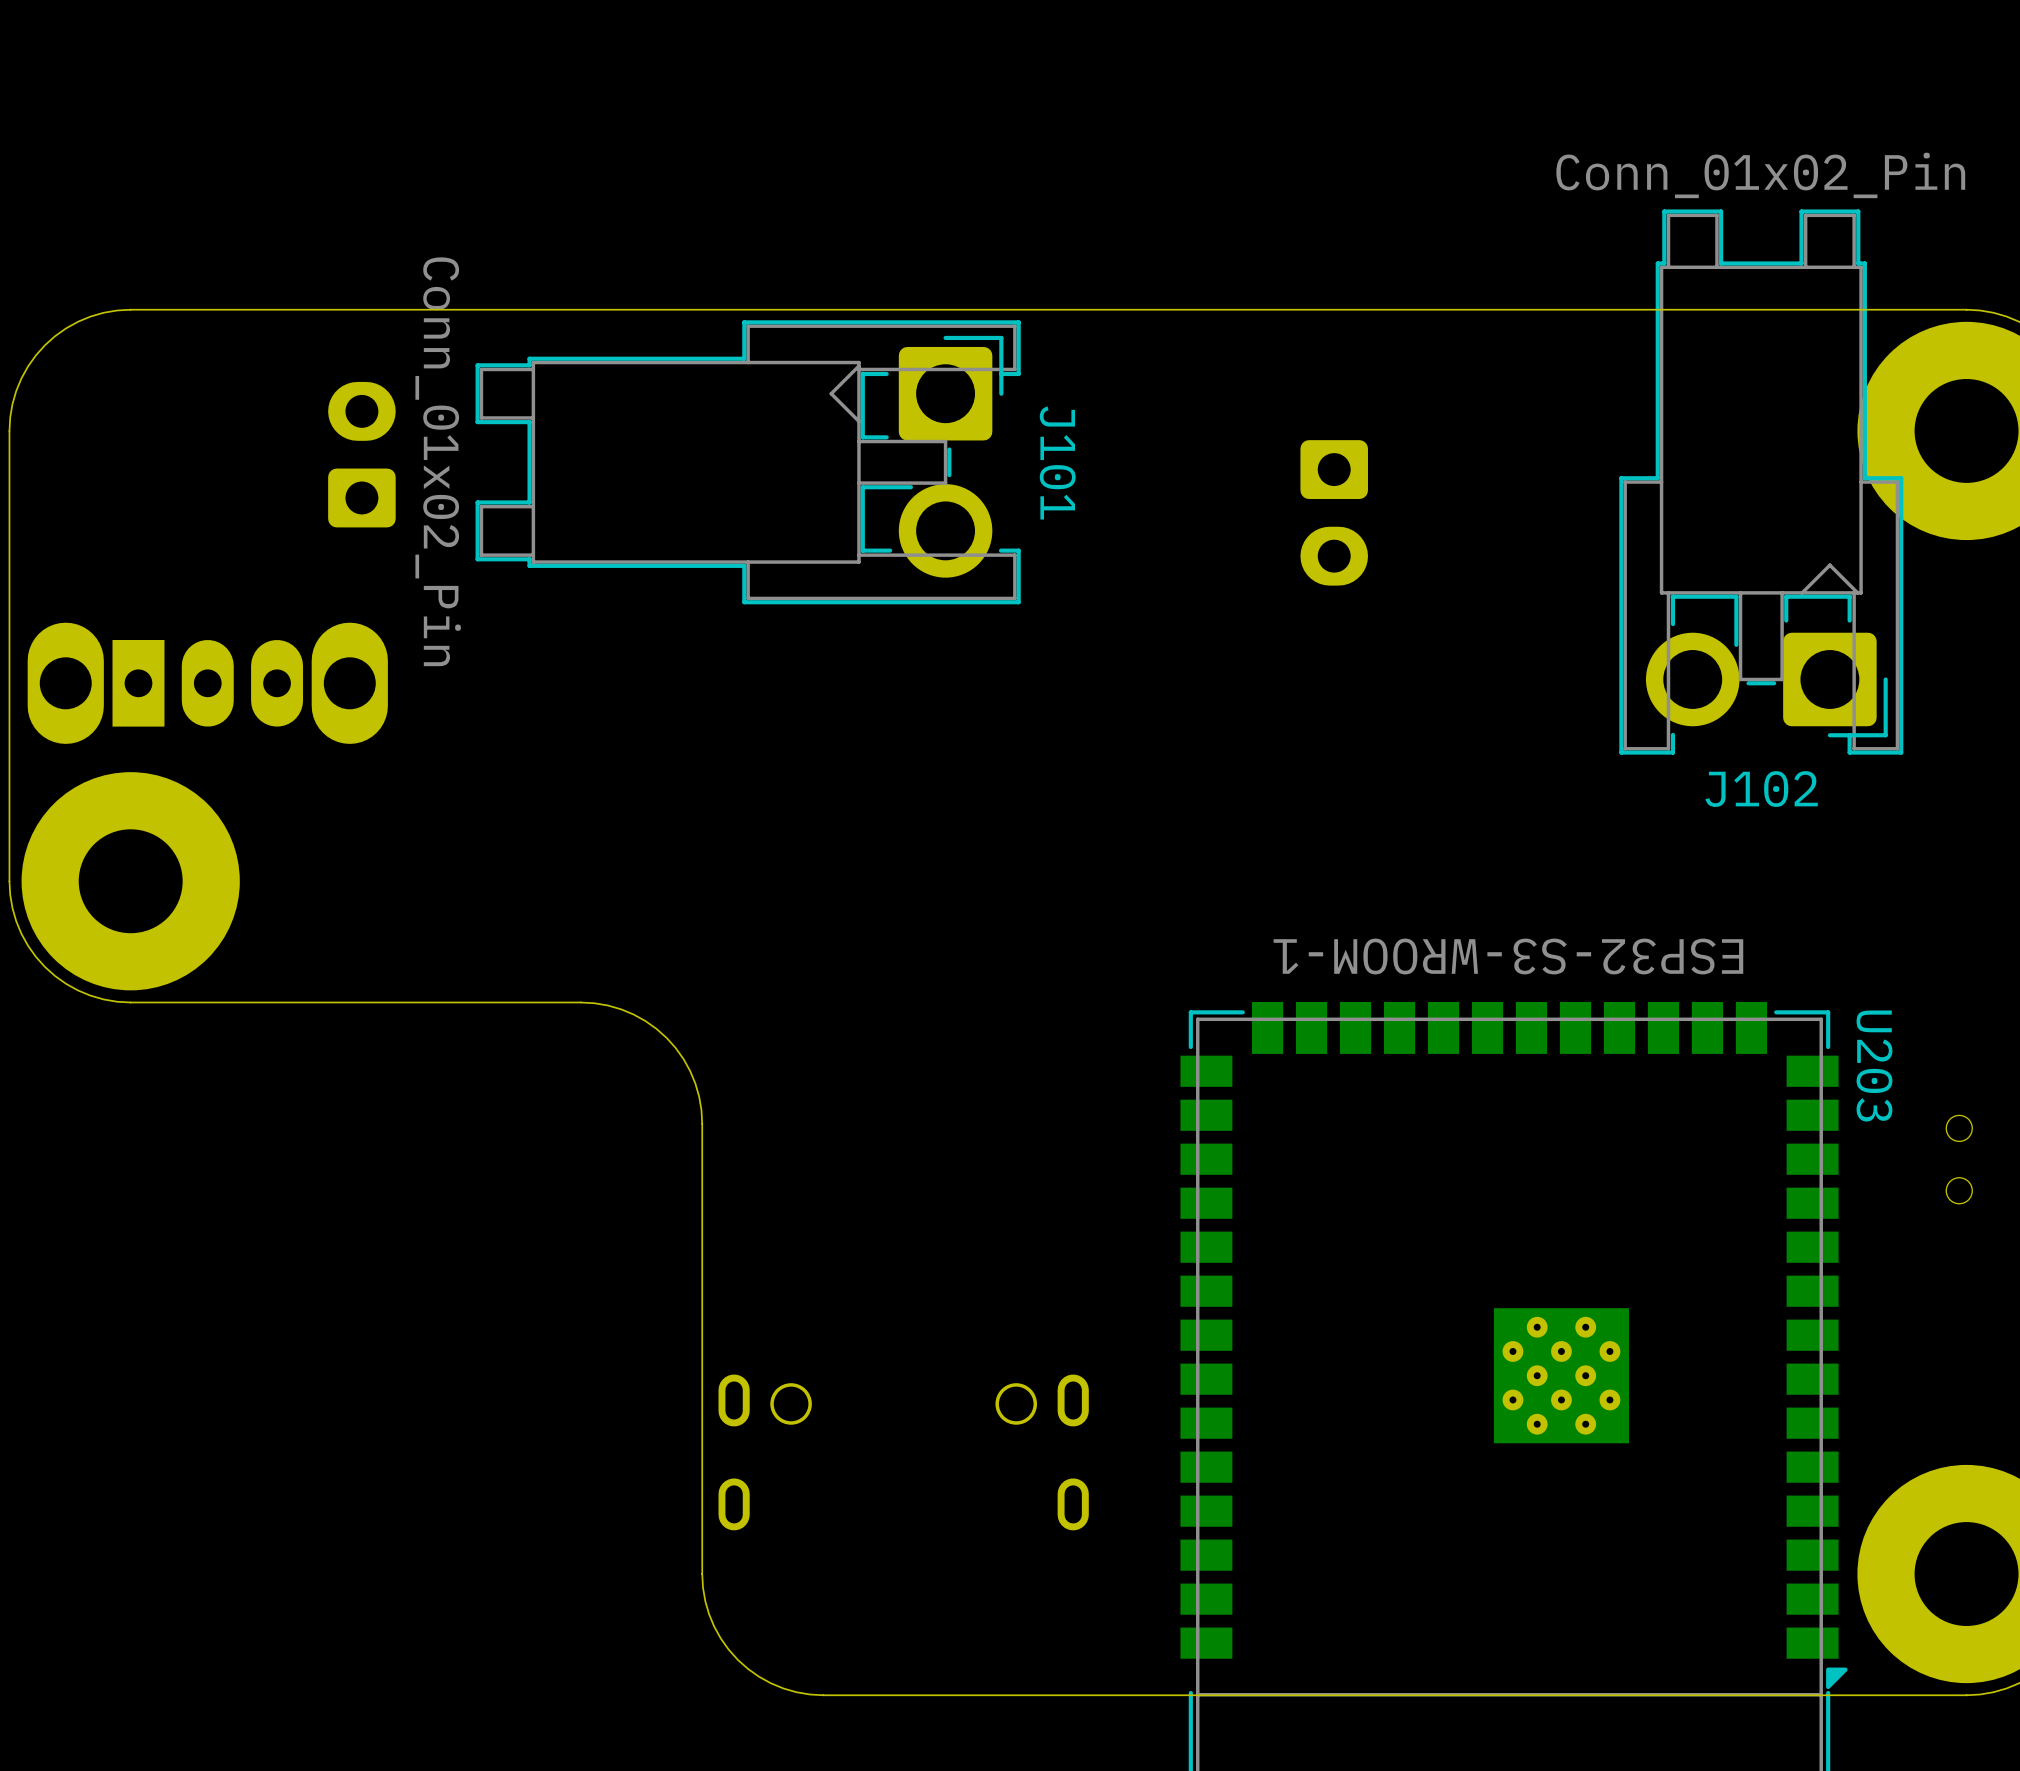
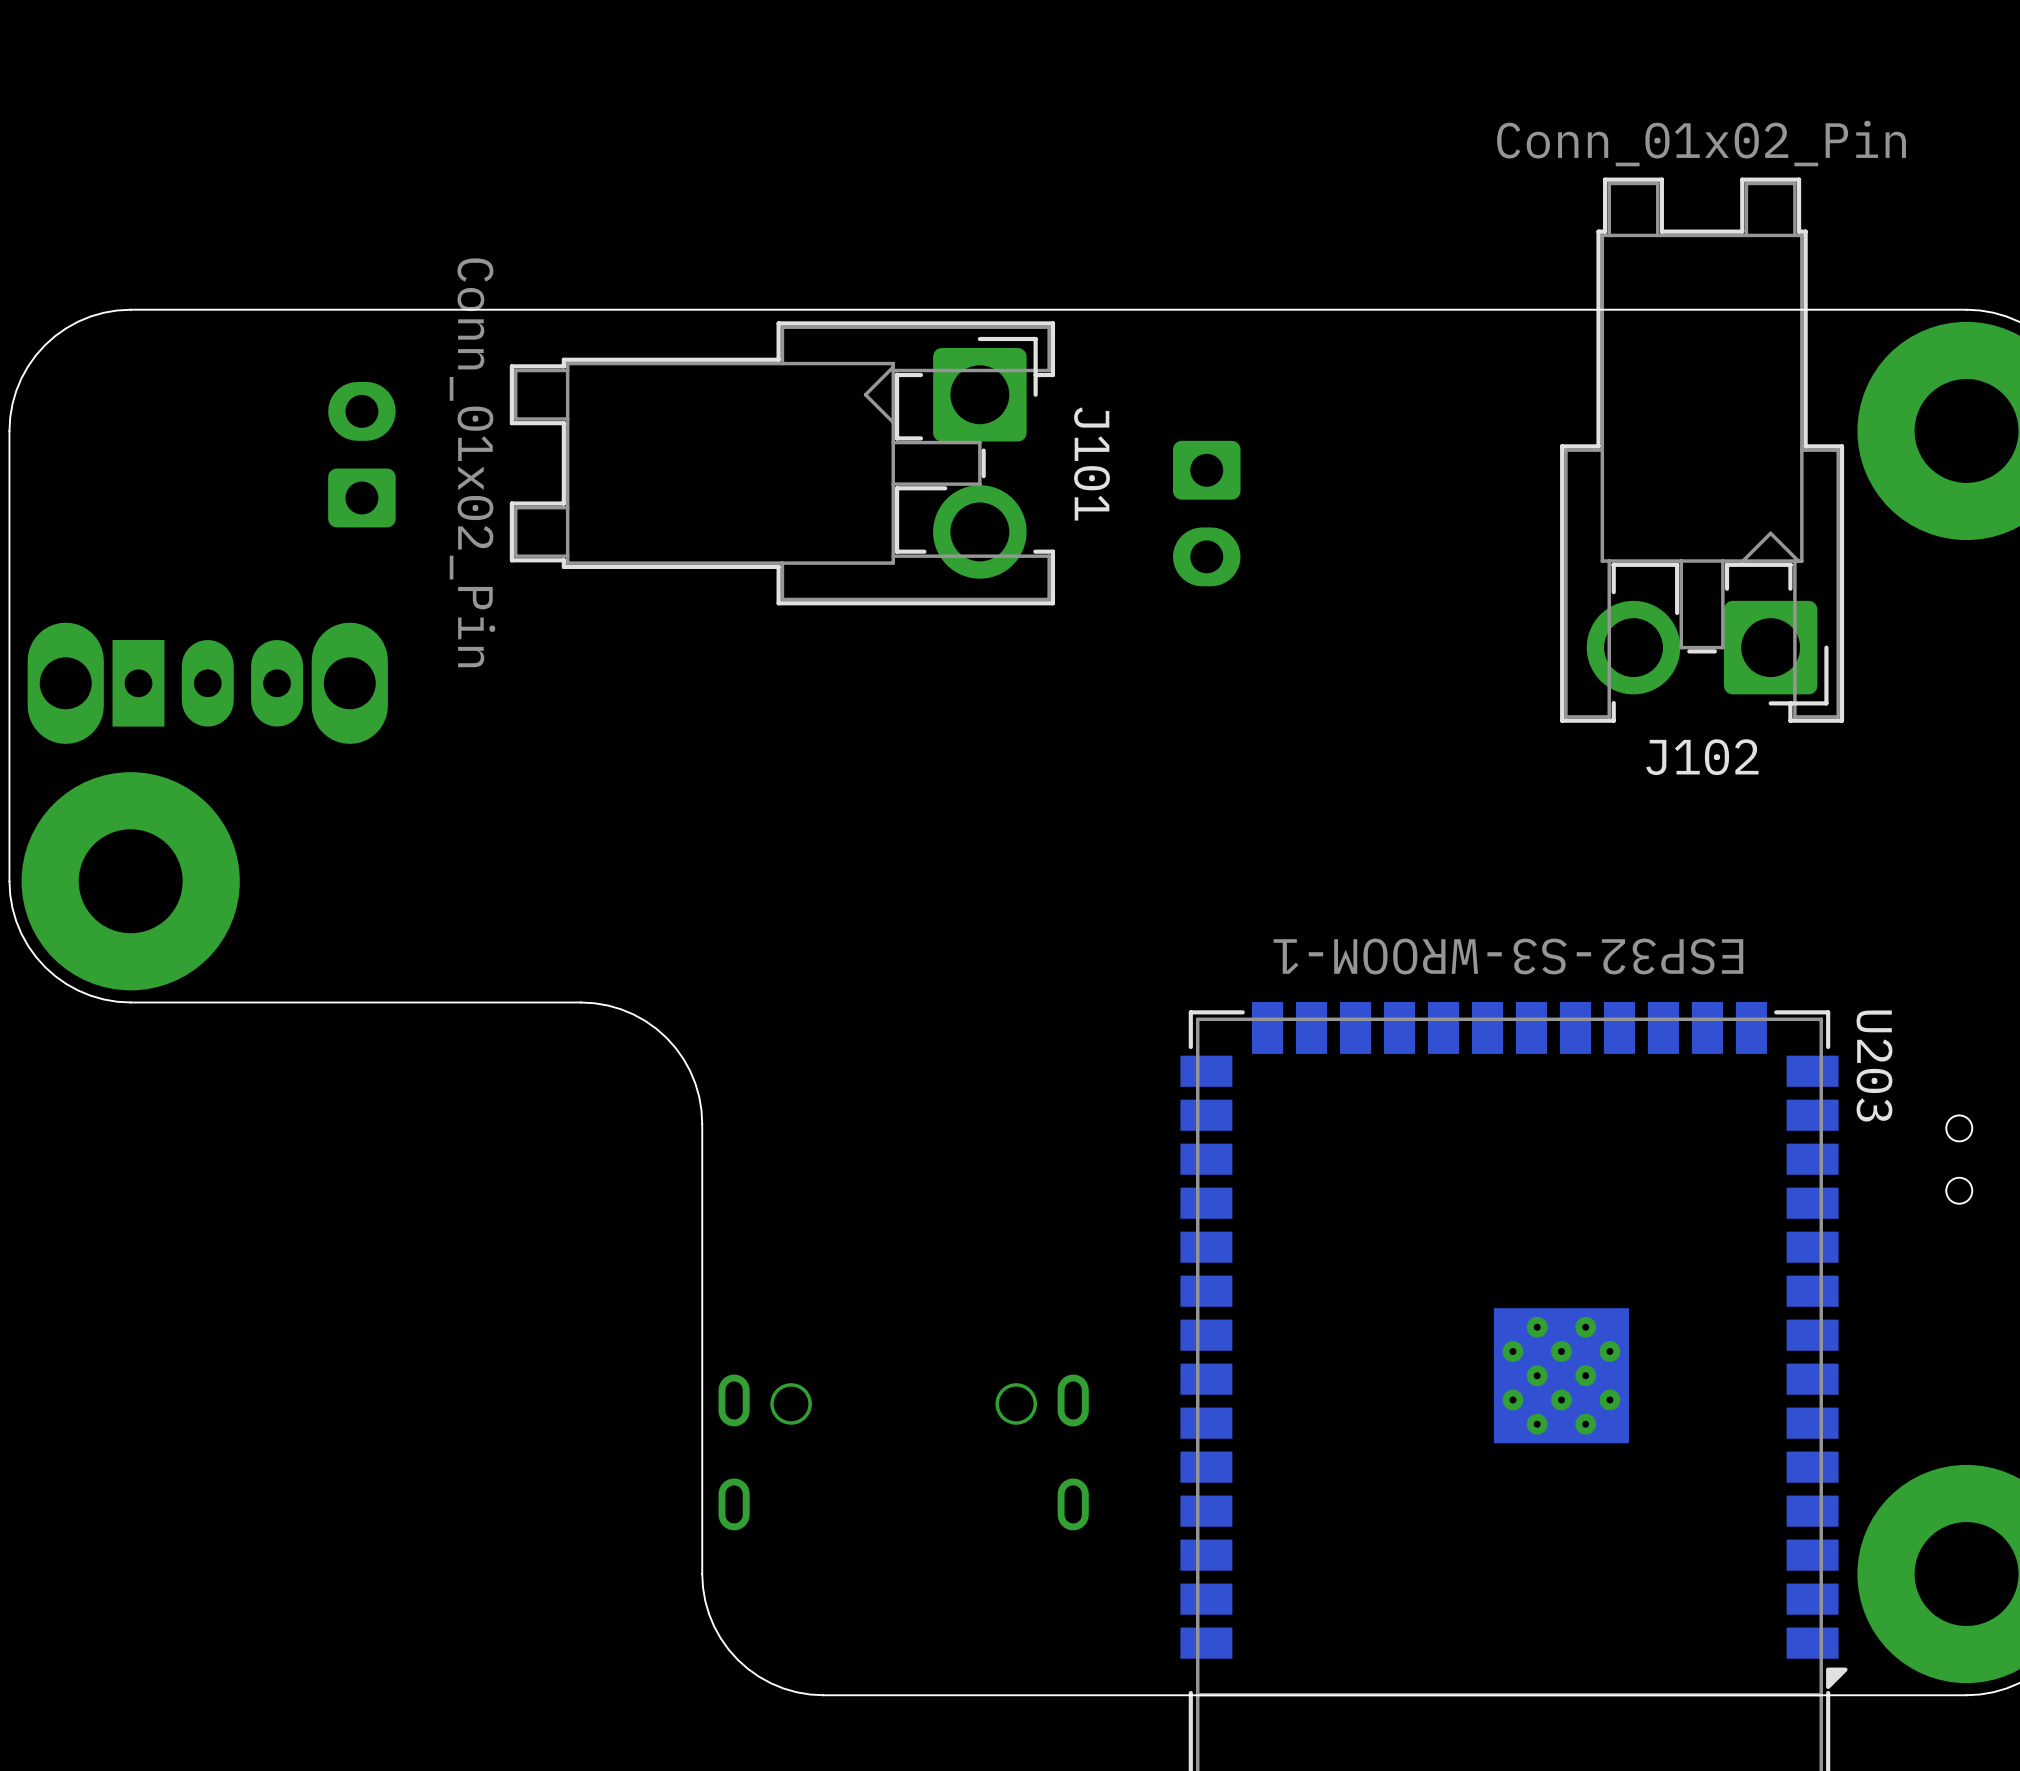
J101 position: (748, 462) -> (782, 463)
J102 position: (1761, 482) -> (1702, 450)
part position: (1334, 512) -> (1206, 513)

